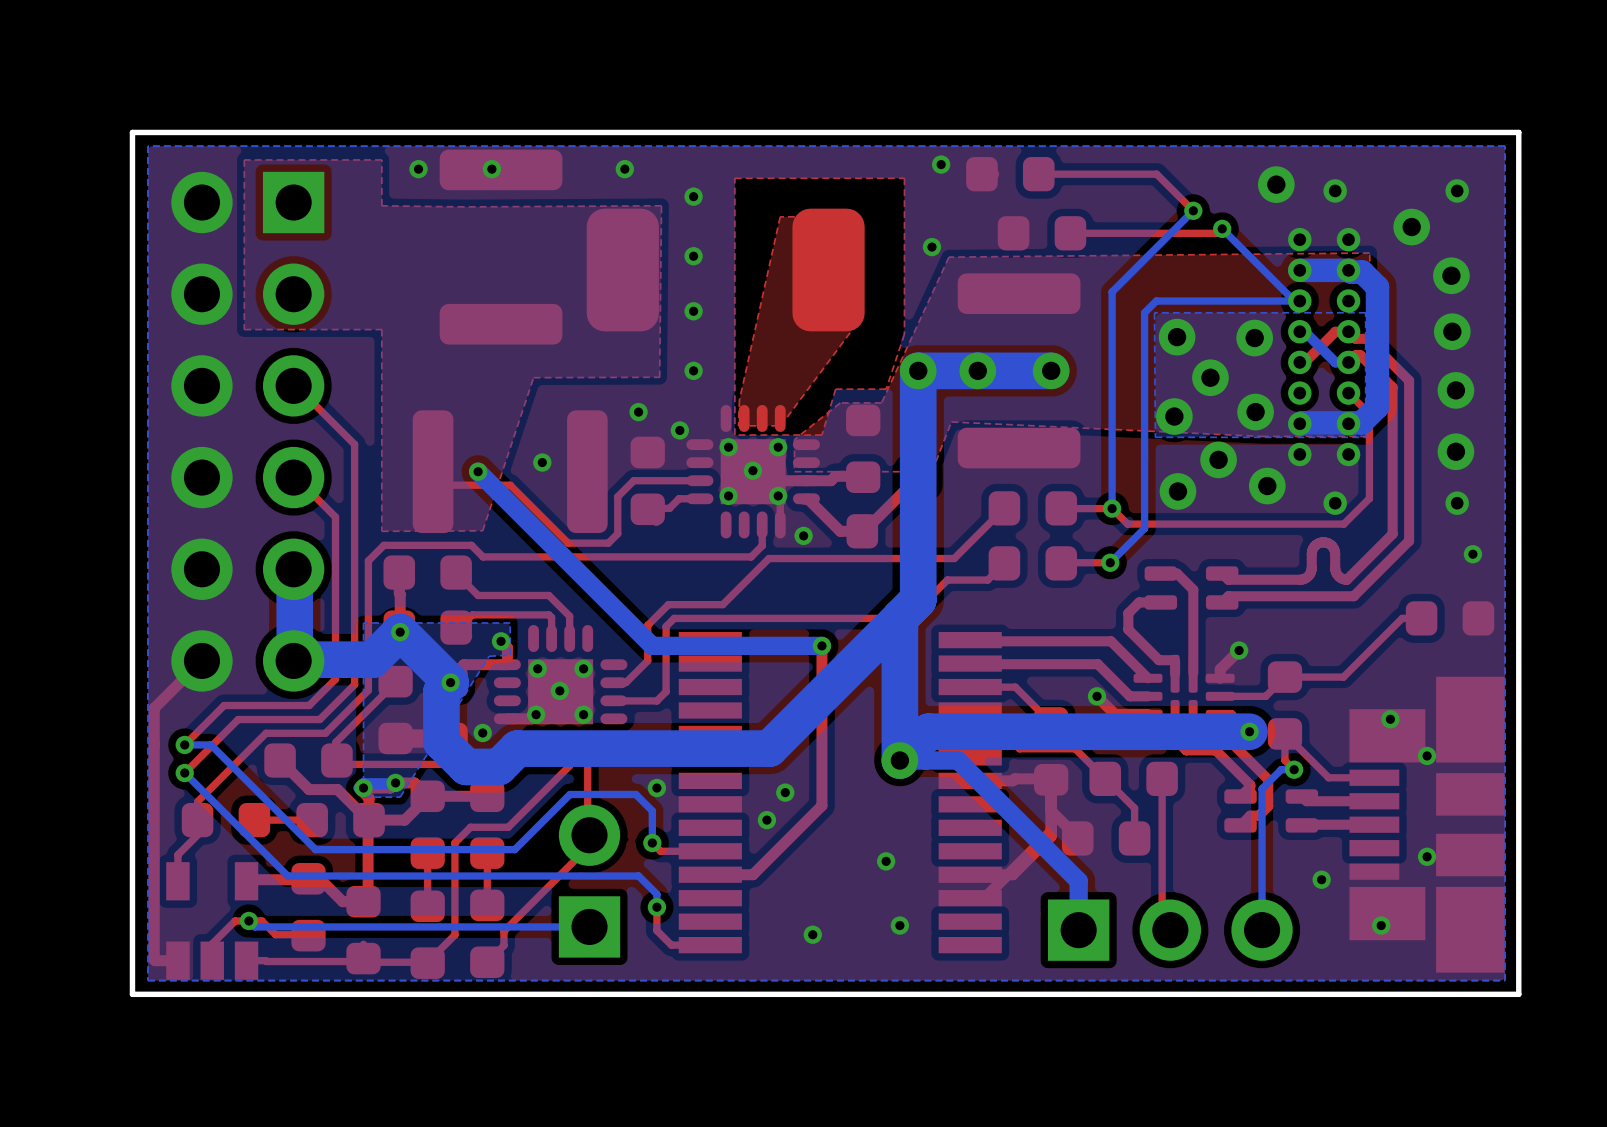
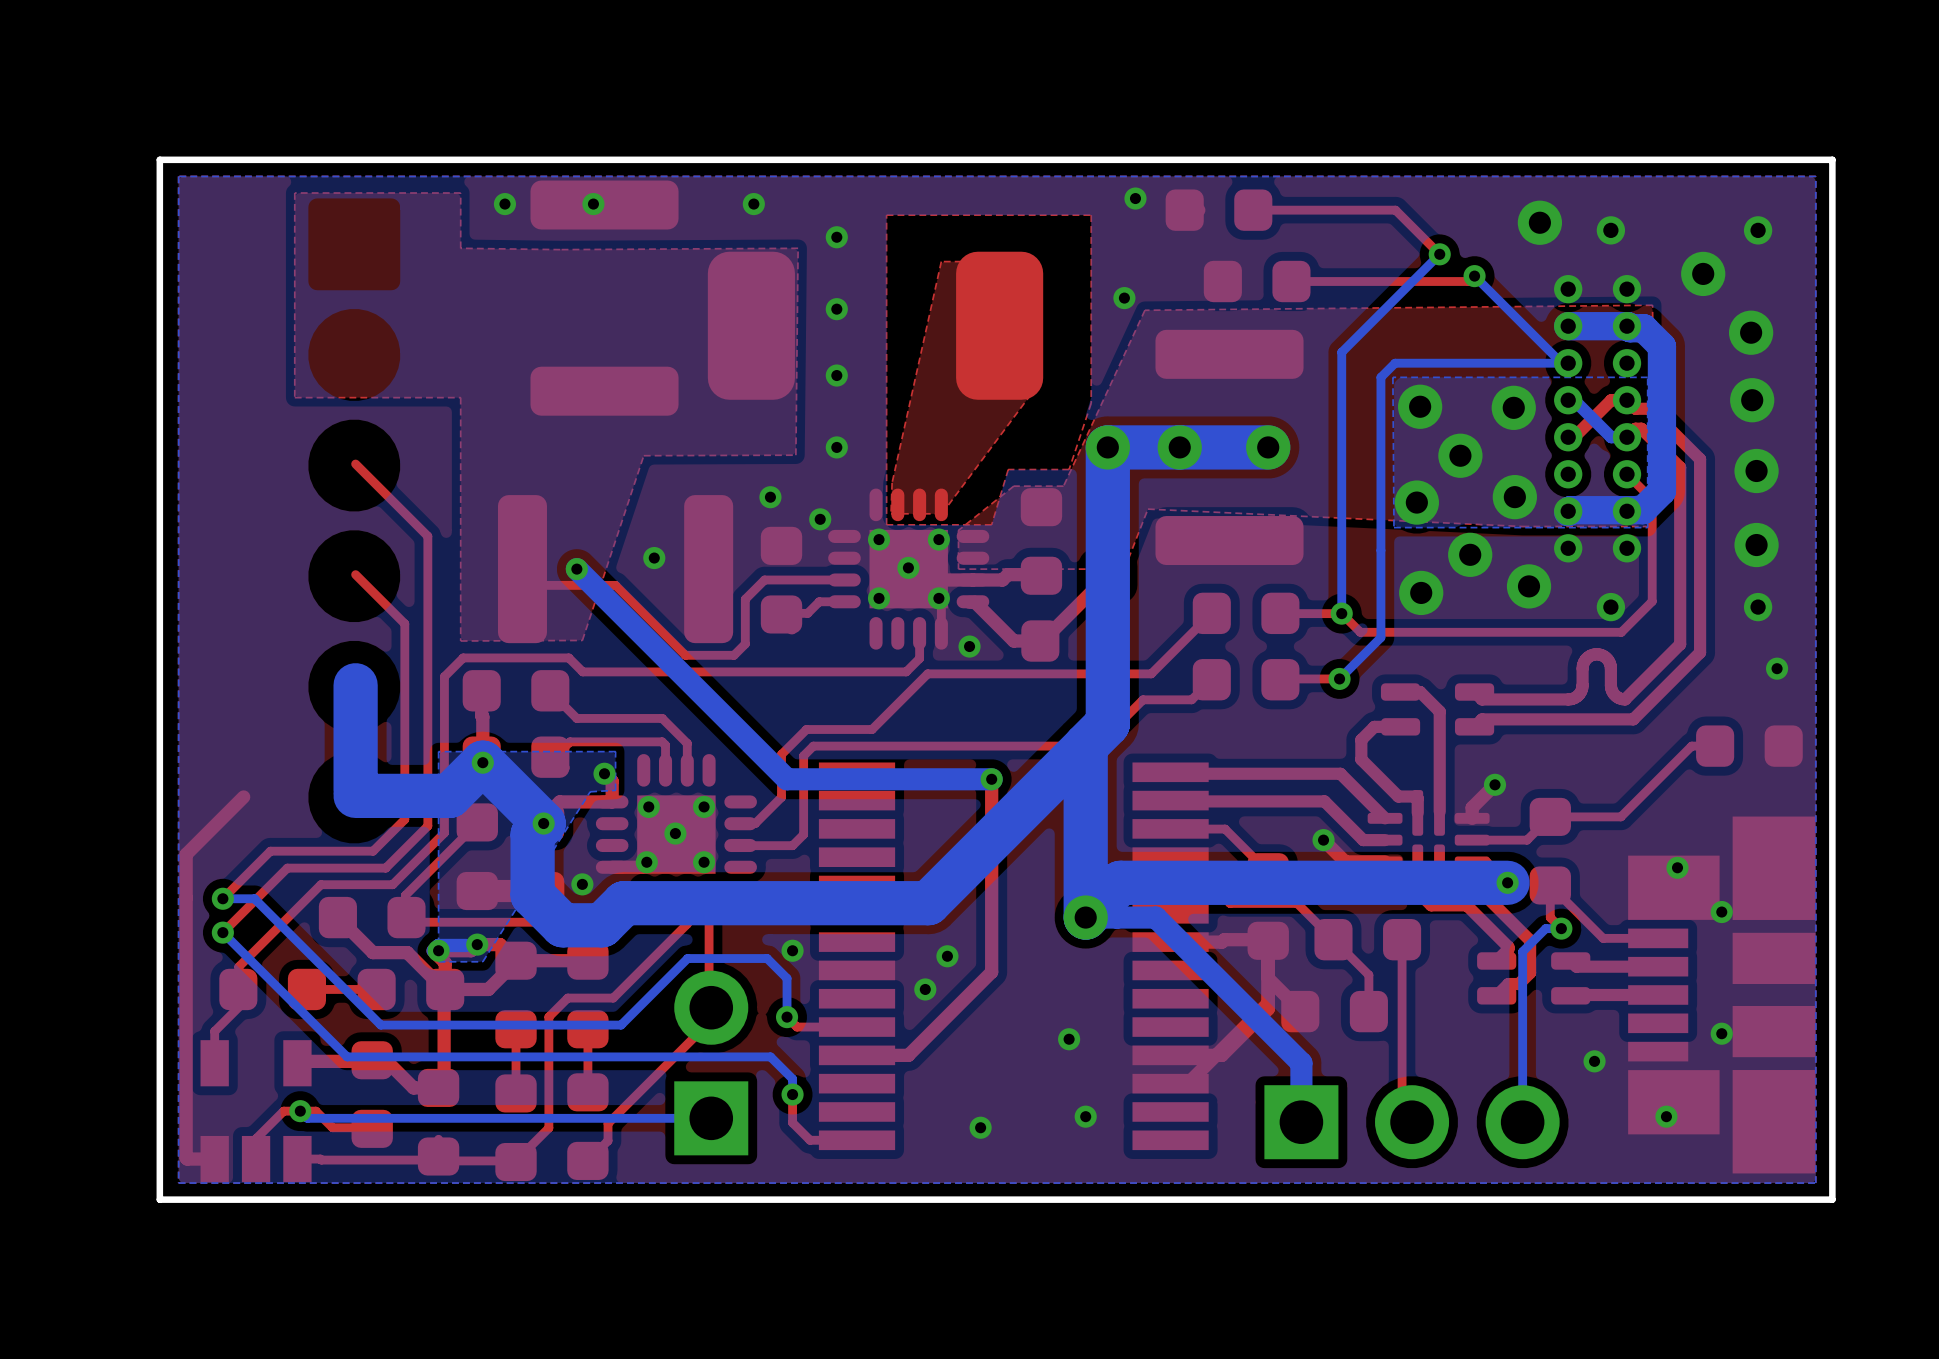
part: (247, 431) -> none

